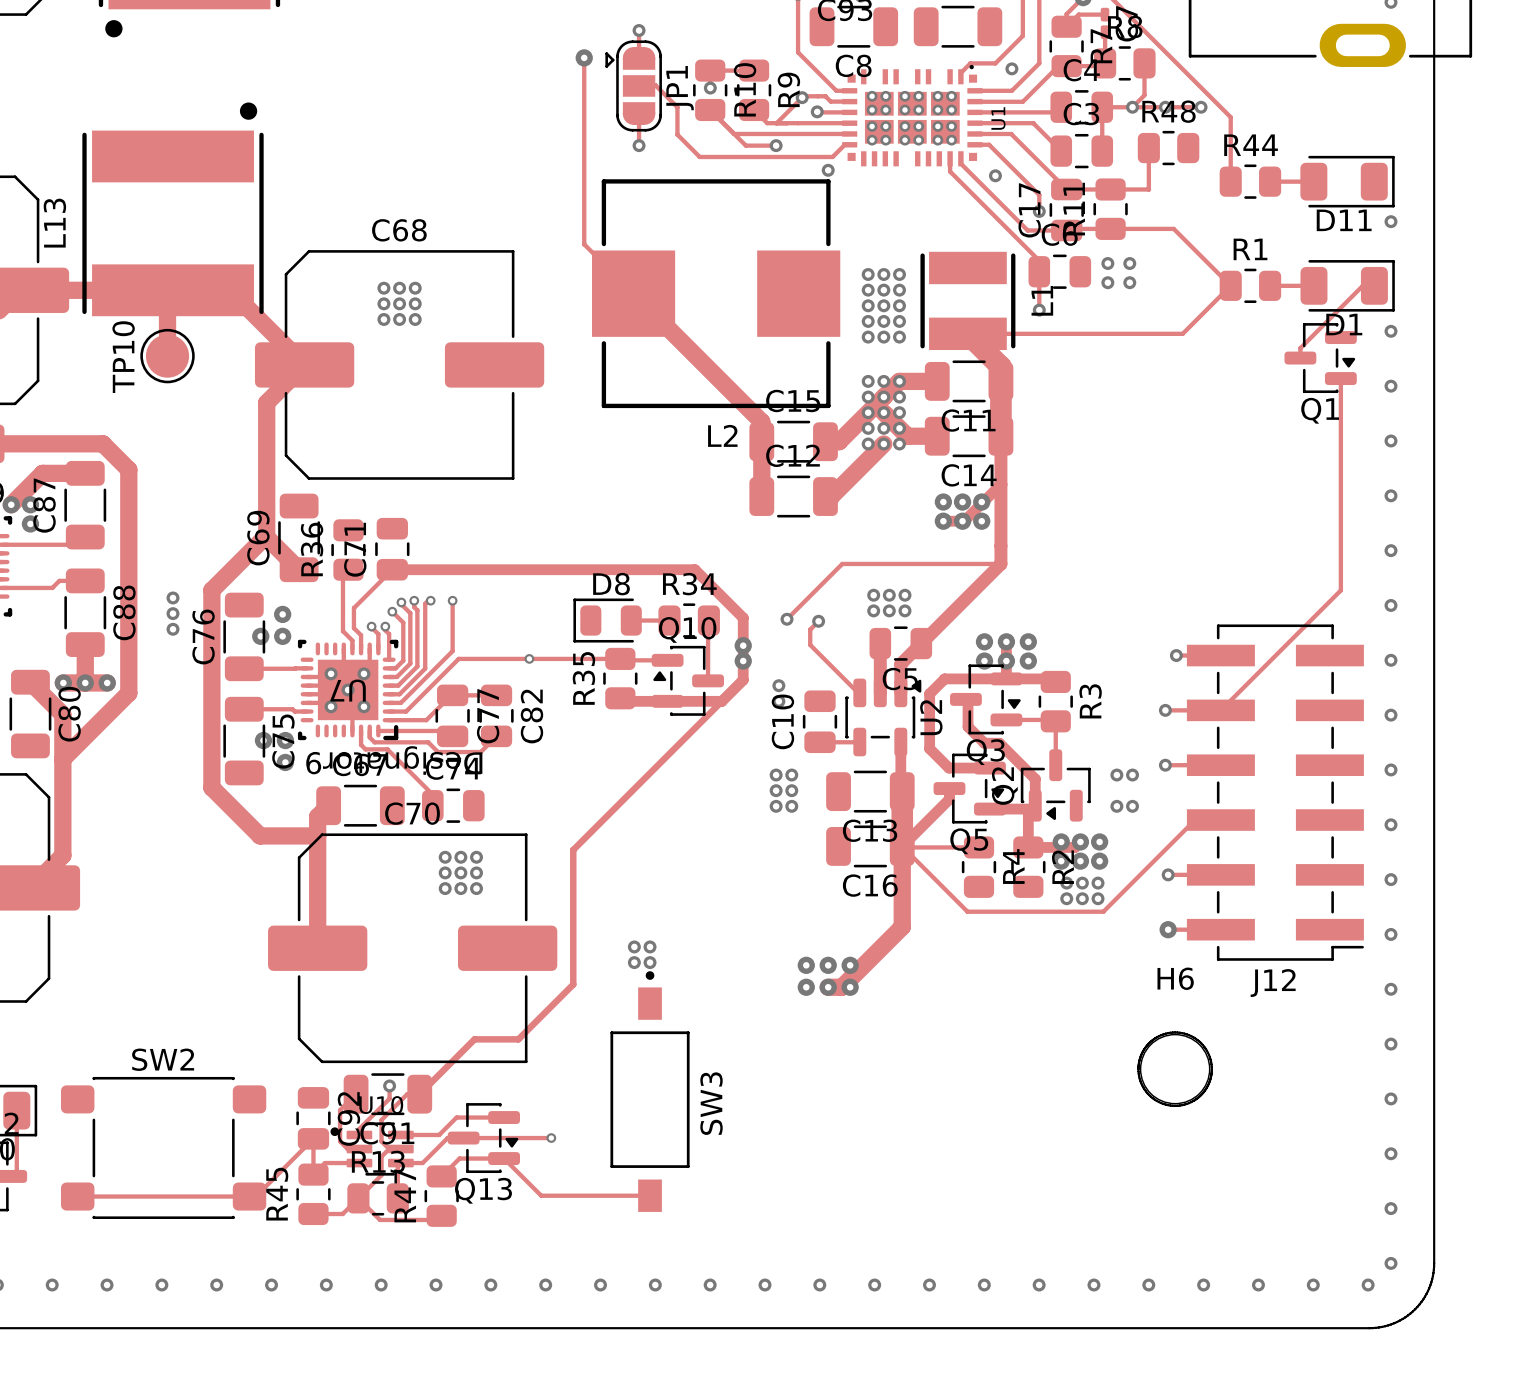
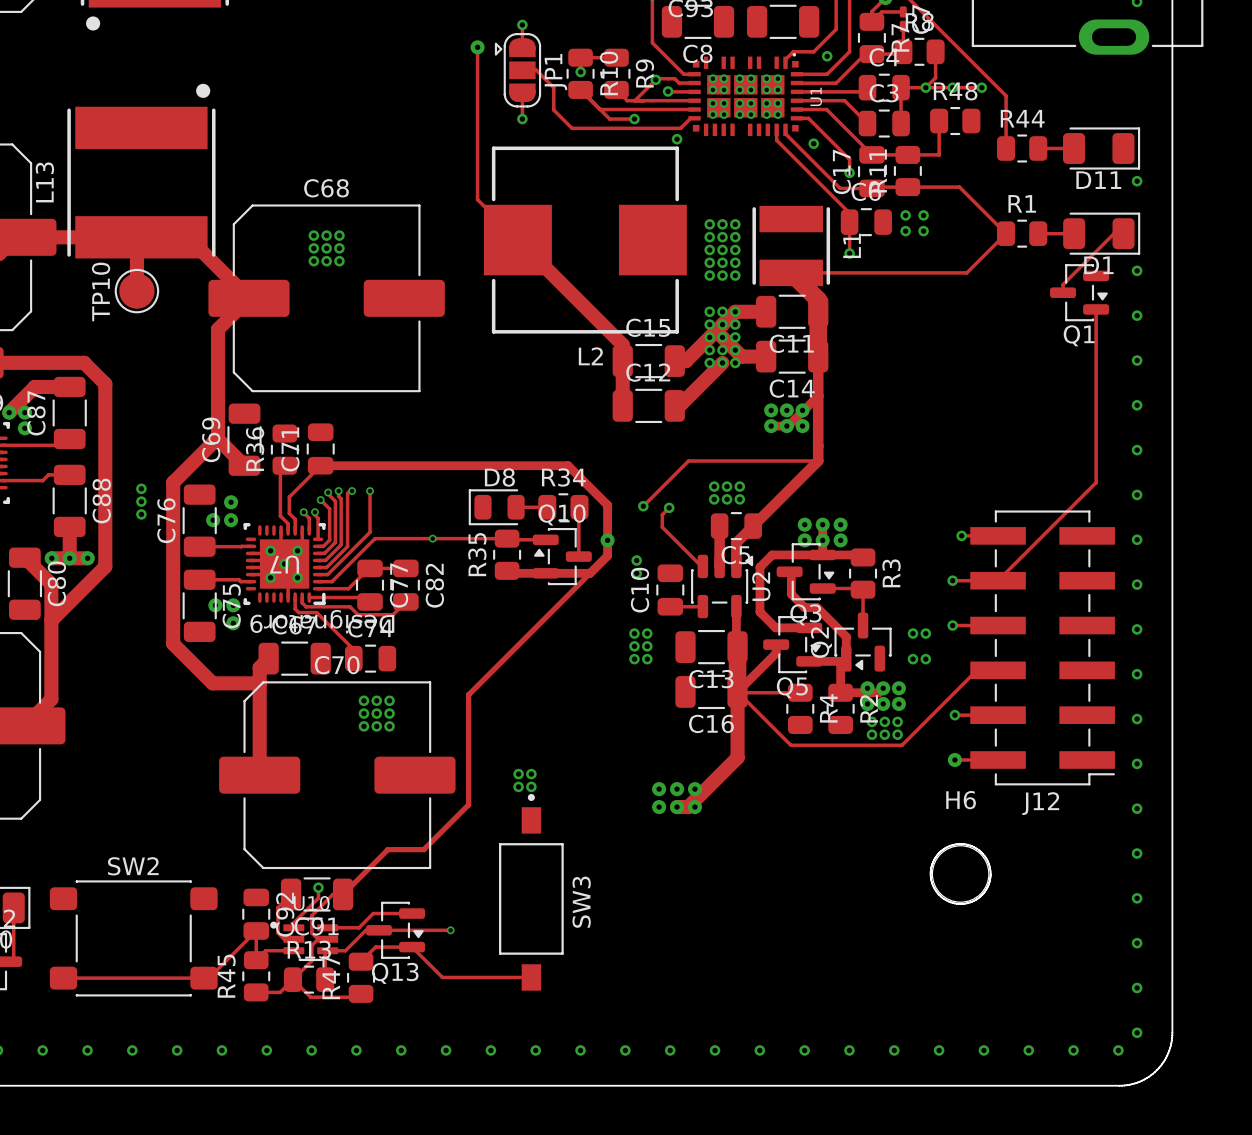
via: (743, 645) -> none

